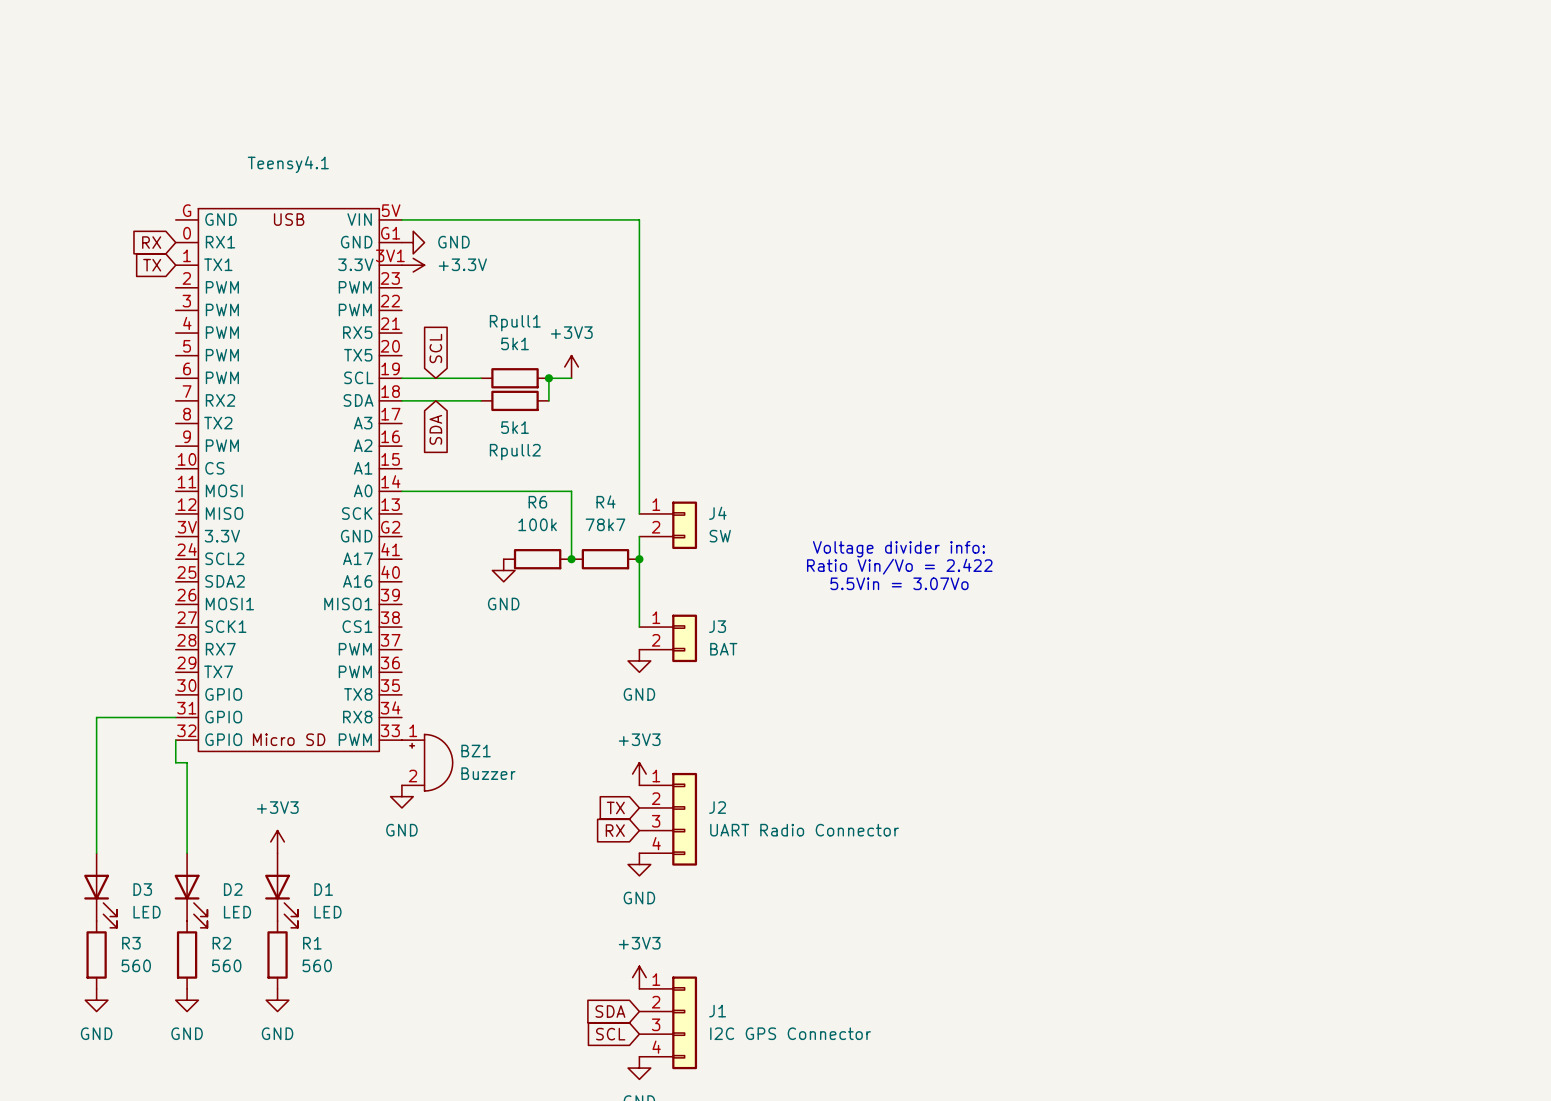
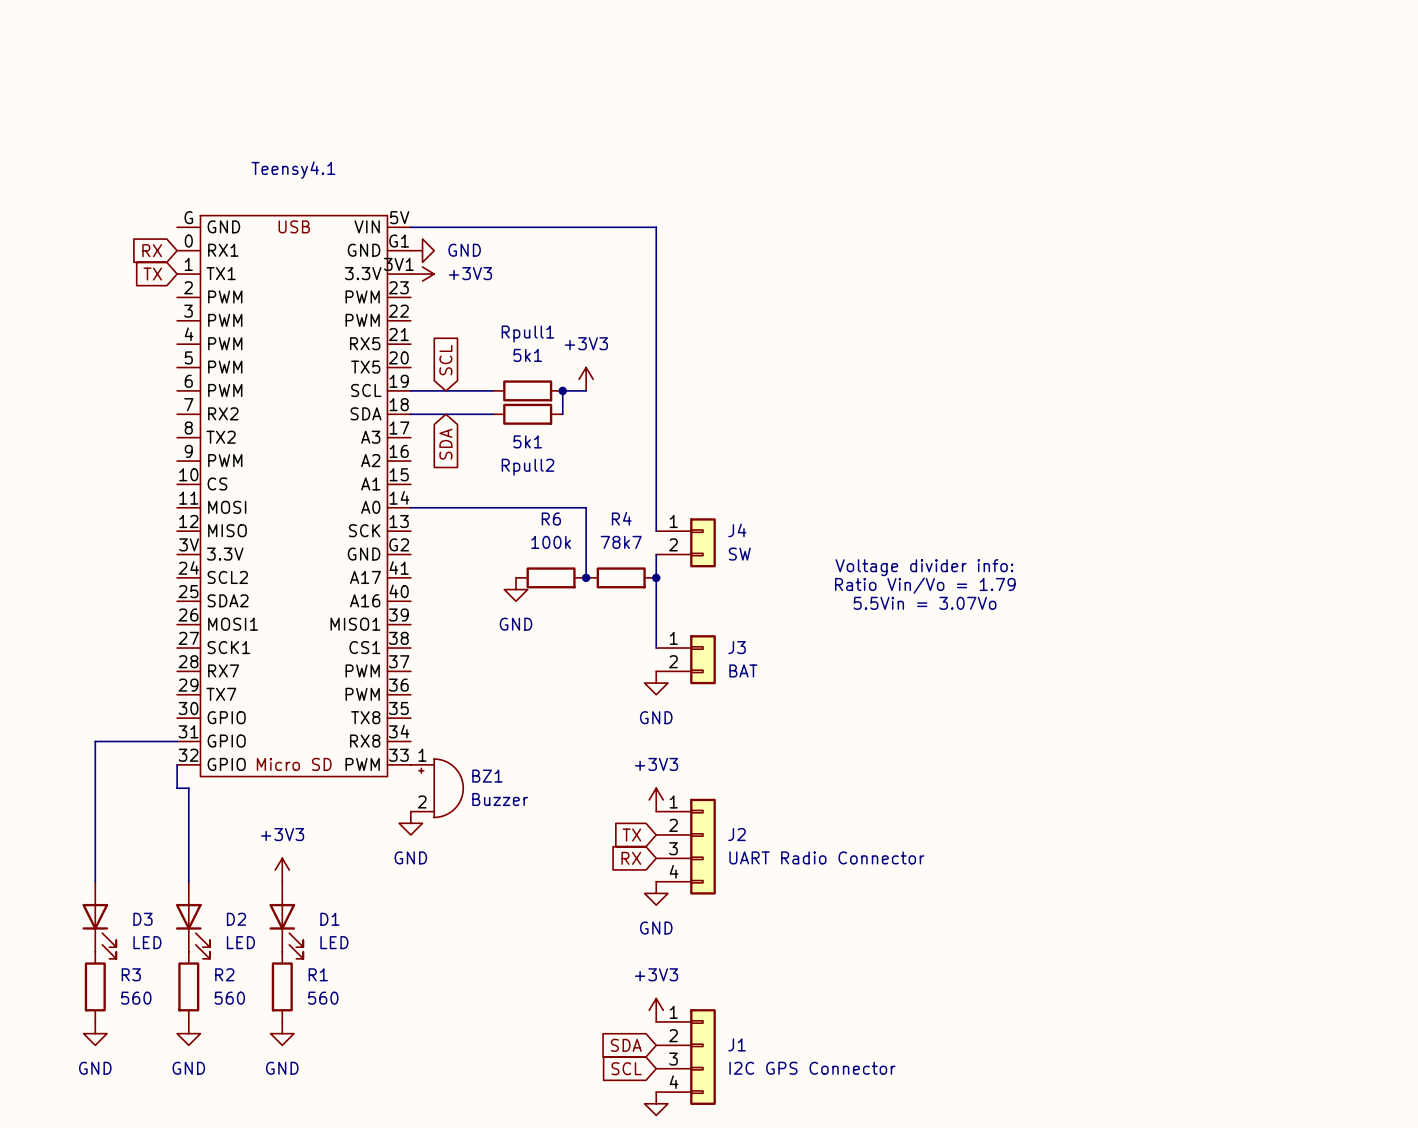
power symbol: +3.3V (413, 265) -> +3V3 (422, 274)
text: Ratio Vin/Vo = 2.422 (899, 566) -> Ratio Vin/Vo = 1.79 (925, 585)

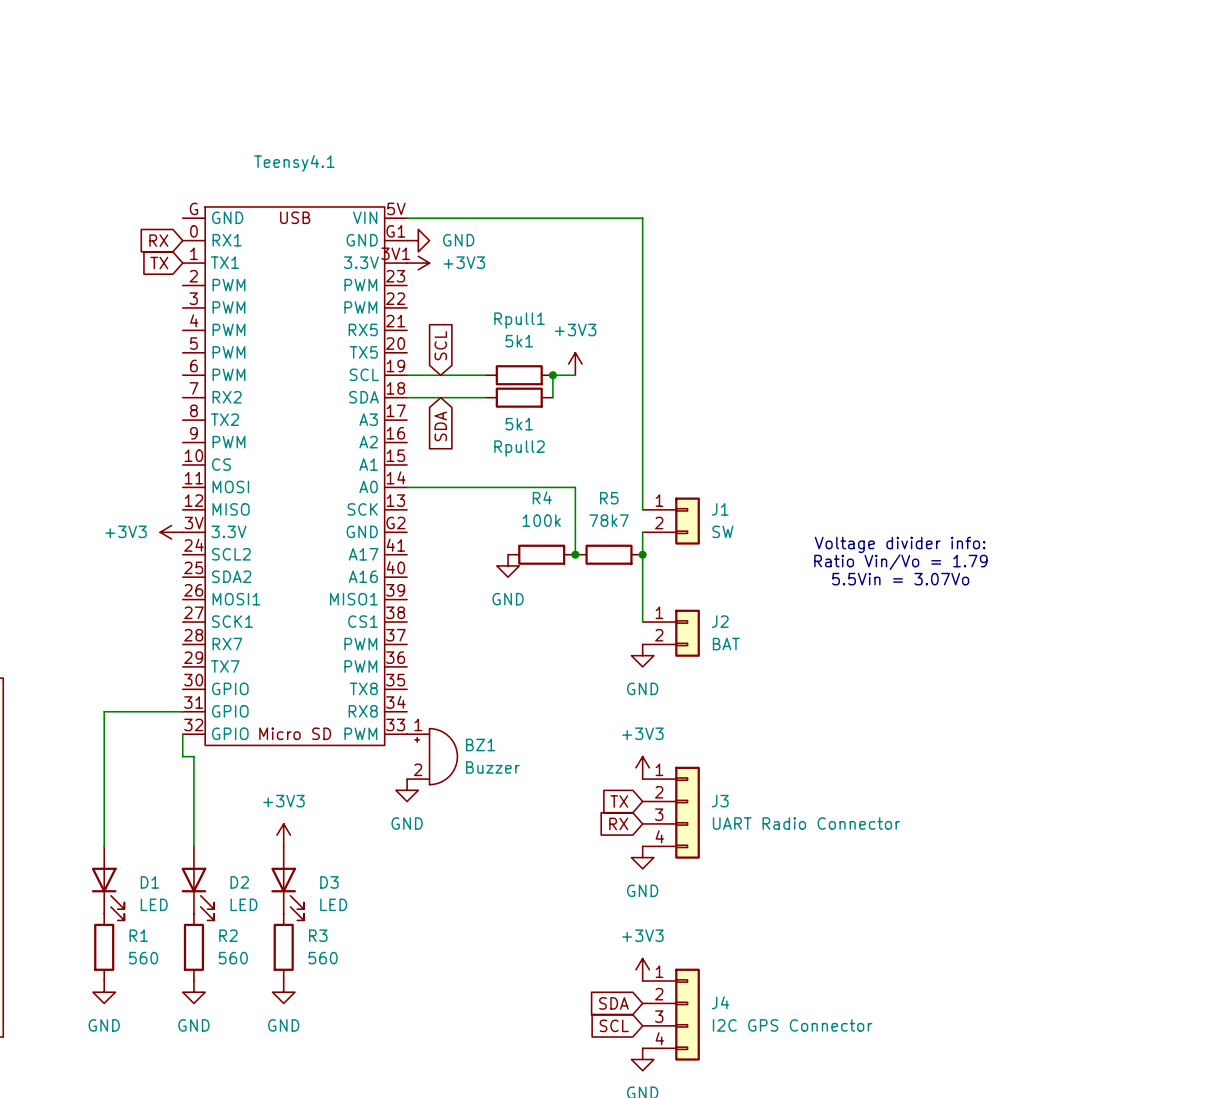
R4 name: R4 (621, 518) -> R5 (609, 498)
R6 name: R6 (551, 519) -> R4 (542, 497)
J4 name: J4 (737, 530) -> J1 (720, 509)
power symbol: none -> +3V3 (171, 532)
J3 name: J3 (737, 647) -> J2 (720, 621)
J2 name: J2 (737, 834) -> J3 (720, 801)
D3 name: D3 (142, 919) -> D1 (149, 882)
D1 name: D1 (329, 919) -> D3 (329, 882)
R3 name: R3 (131, 974) -> R1 (138, 935)
R1 name: R1 (318, 974) -> R3 (318, 935)
J1 name: J1 (737, 1044) -> J4 (720, 1002)

